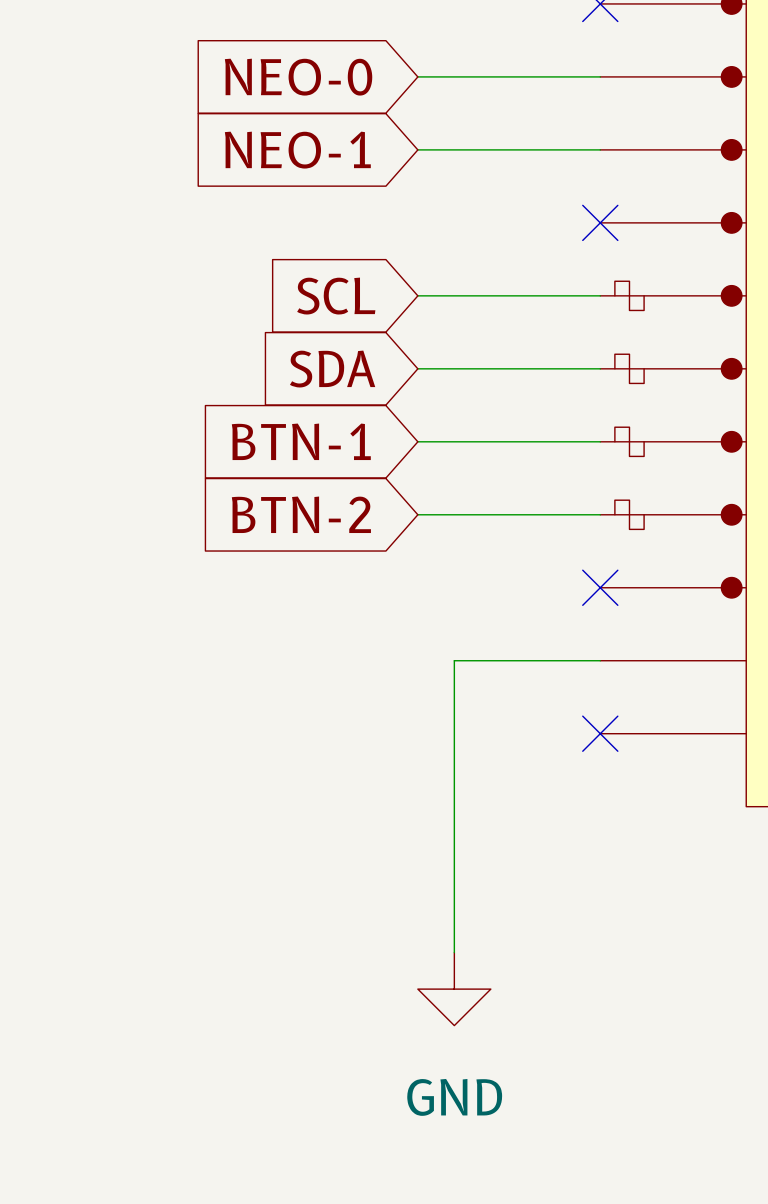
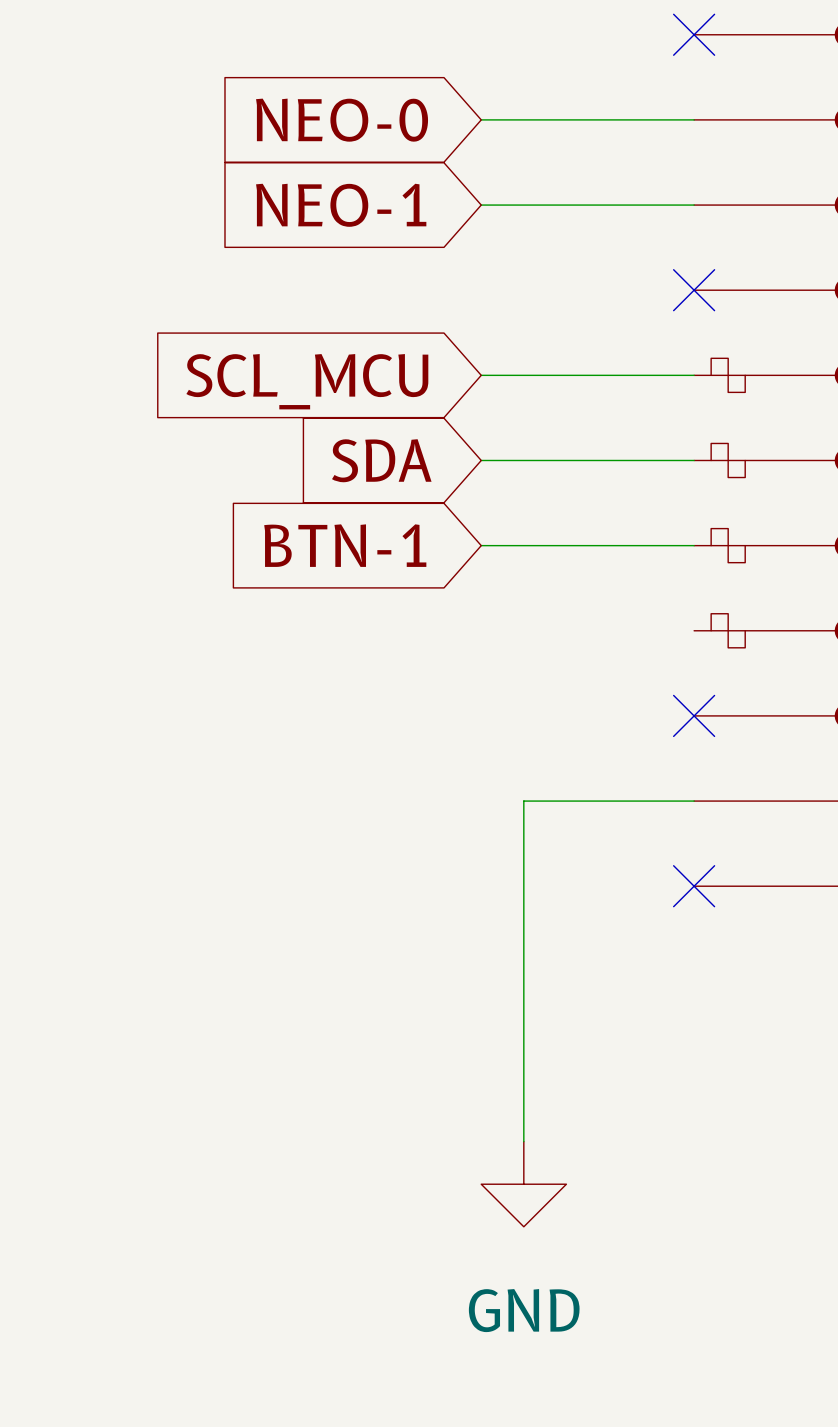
global label: SCL (336, 296) -> SCL_MCU (307, 381)
global label: BTN-2 (301, 514) -> none
wire: (417, 514) (600, 514) -> none

